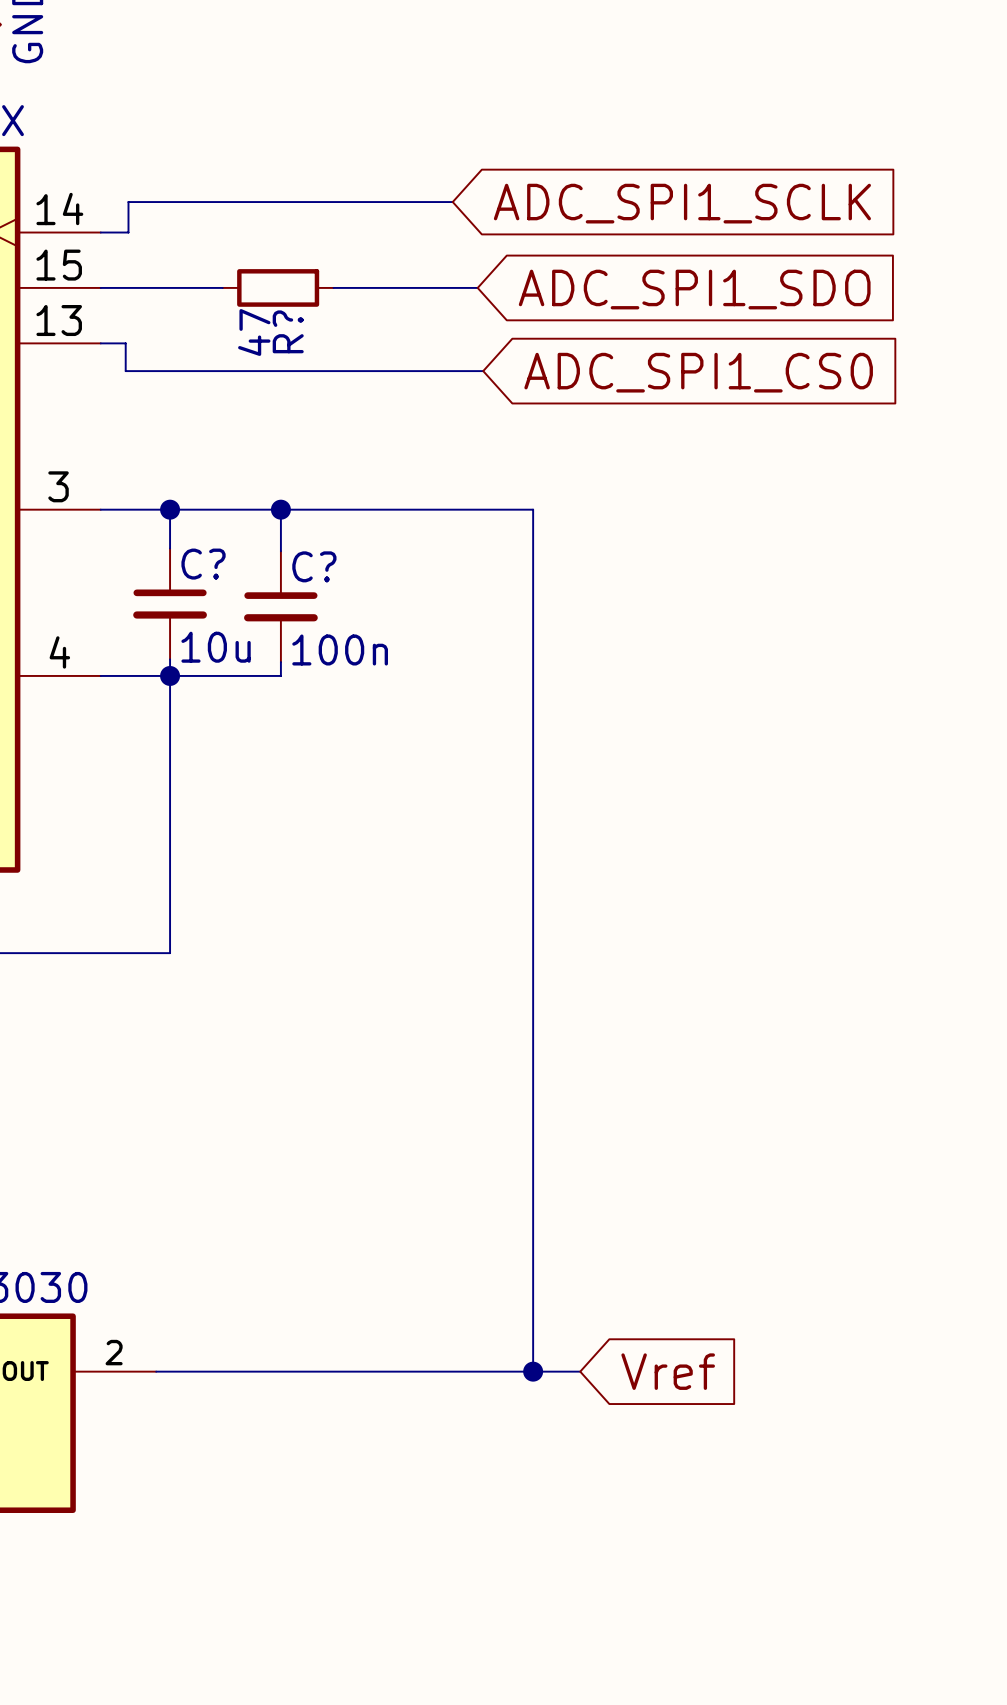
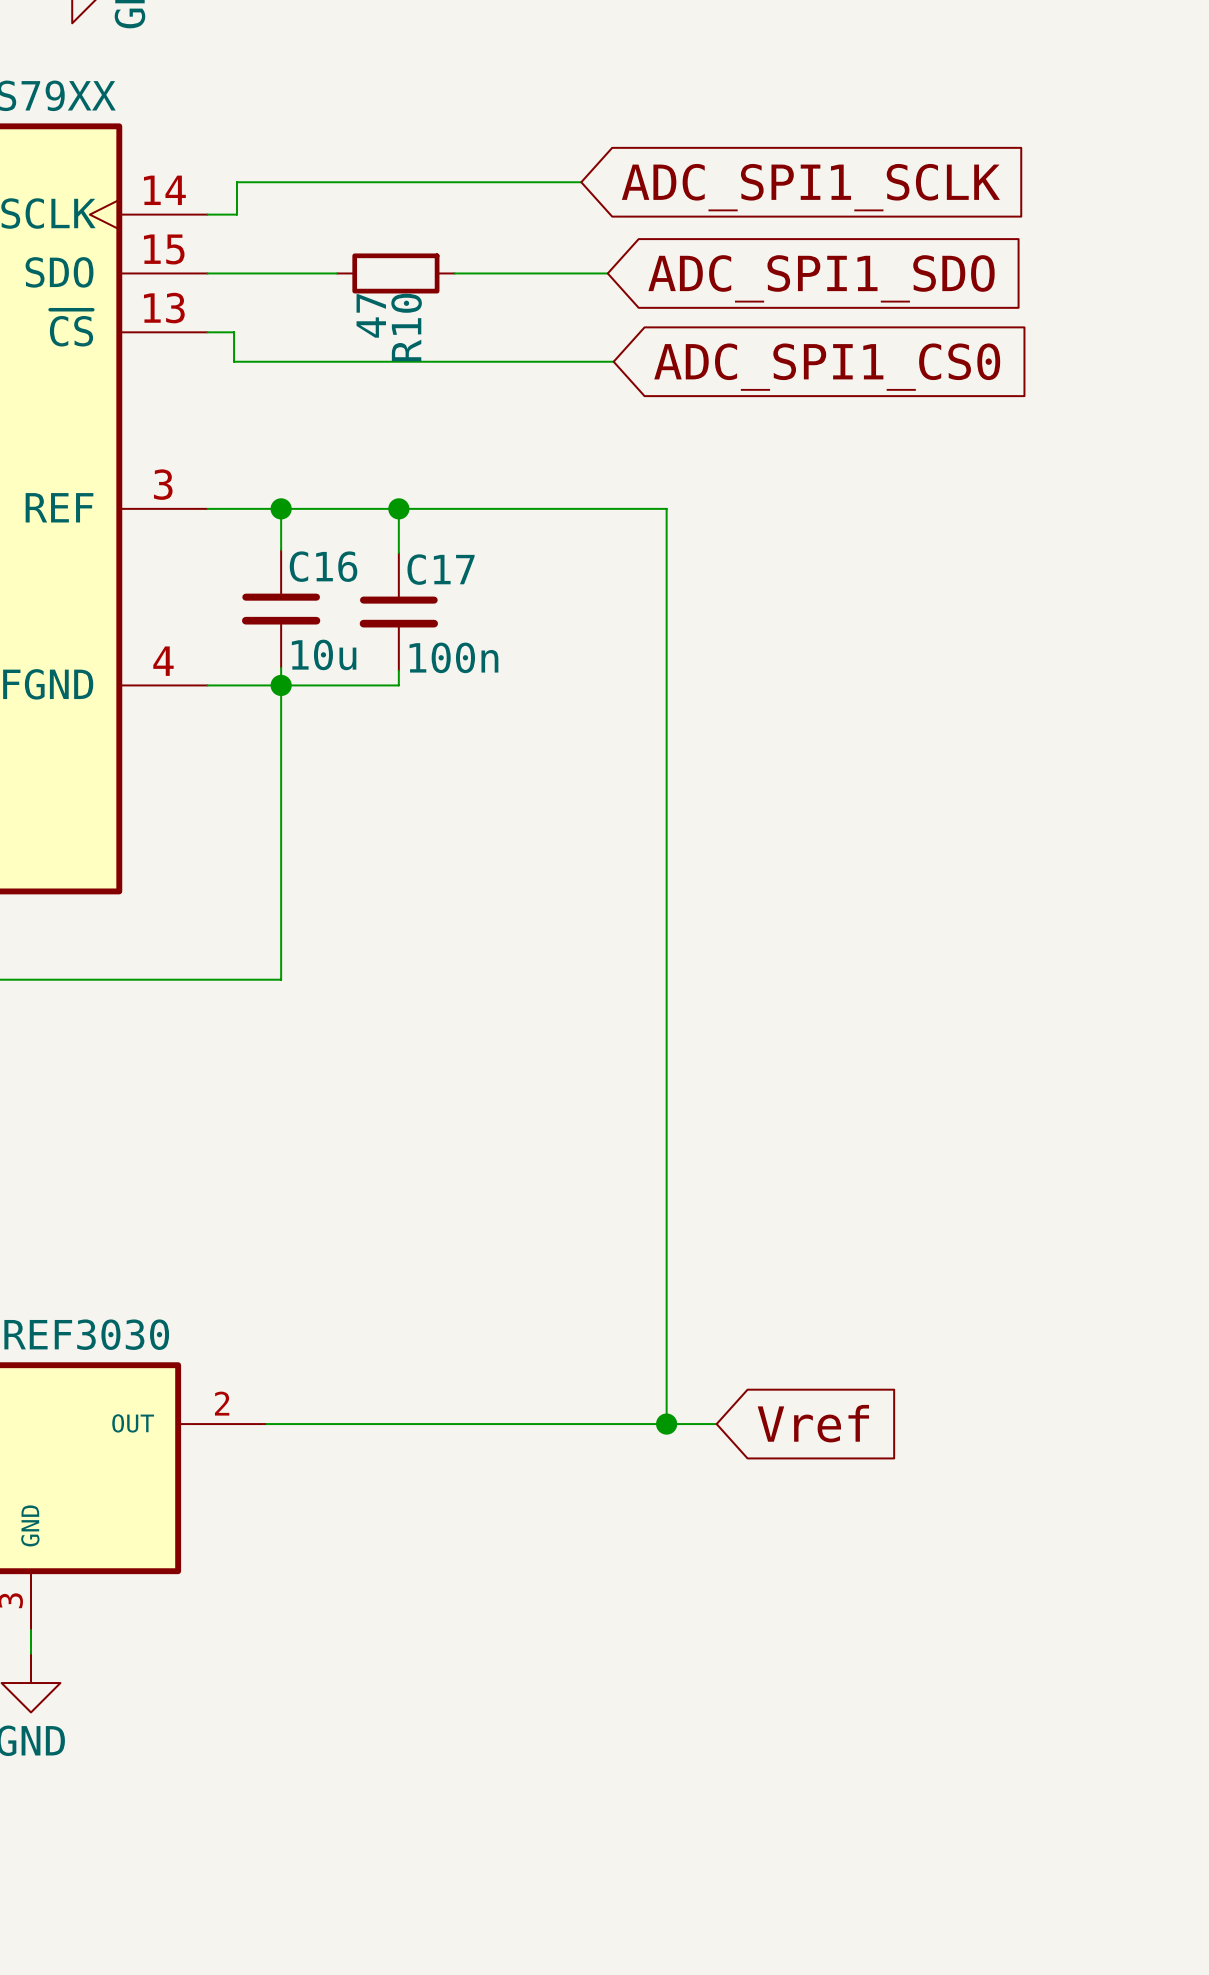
R? name: R? (288, 331) -> R10 (406, 327)
C? name: C? (203, 564) -> C16 (323, 566)
C? name: C? (314, 566) -> C17 (441, 569)

